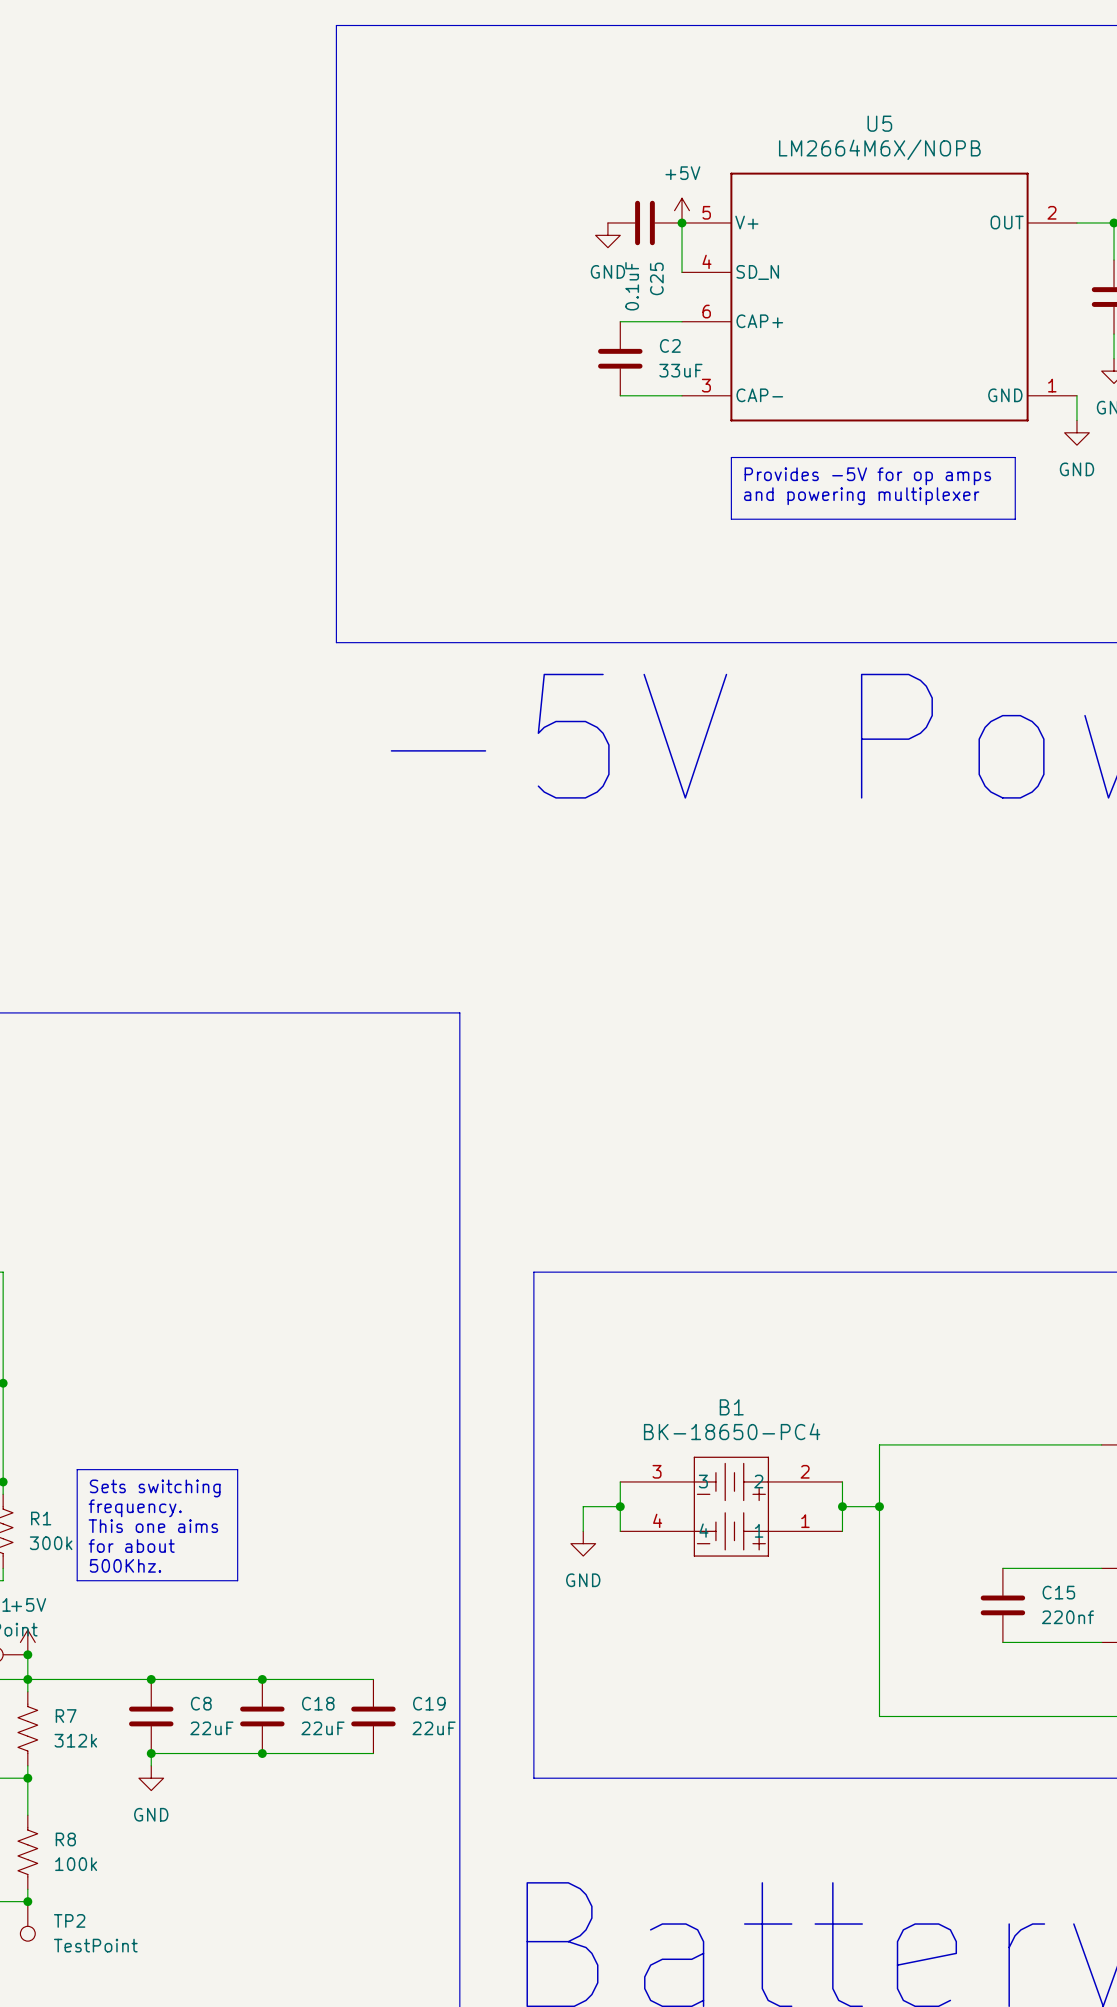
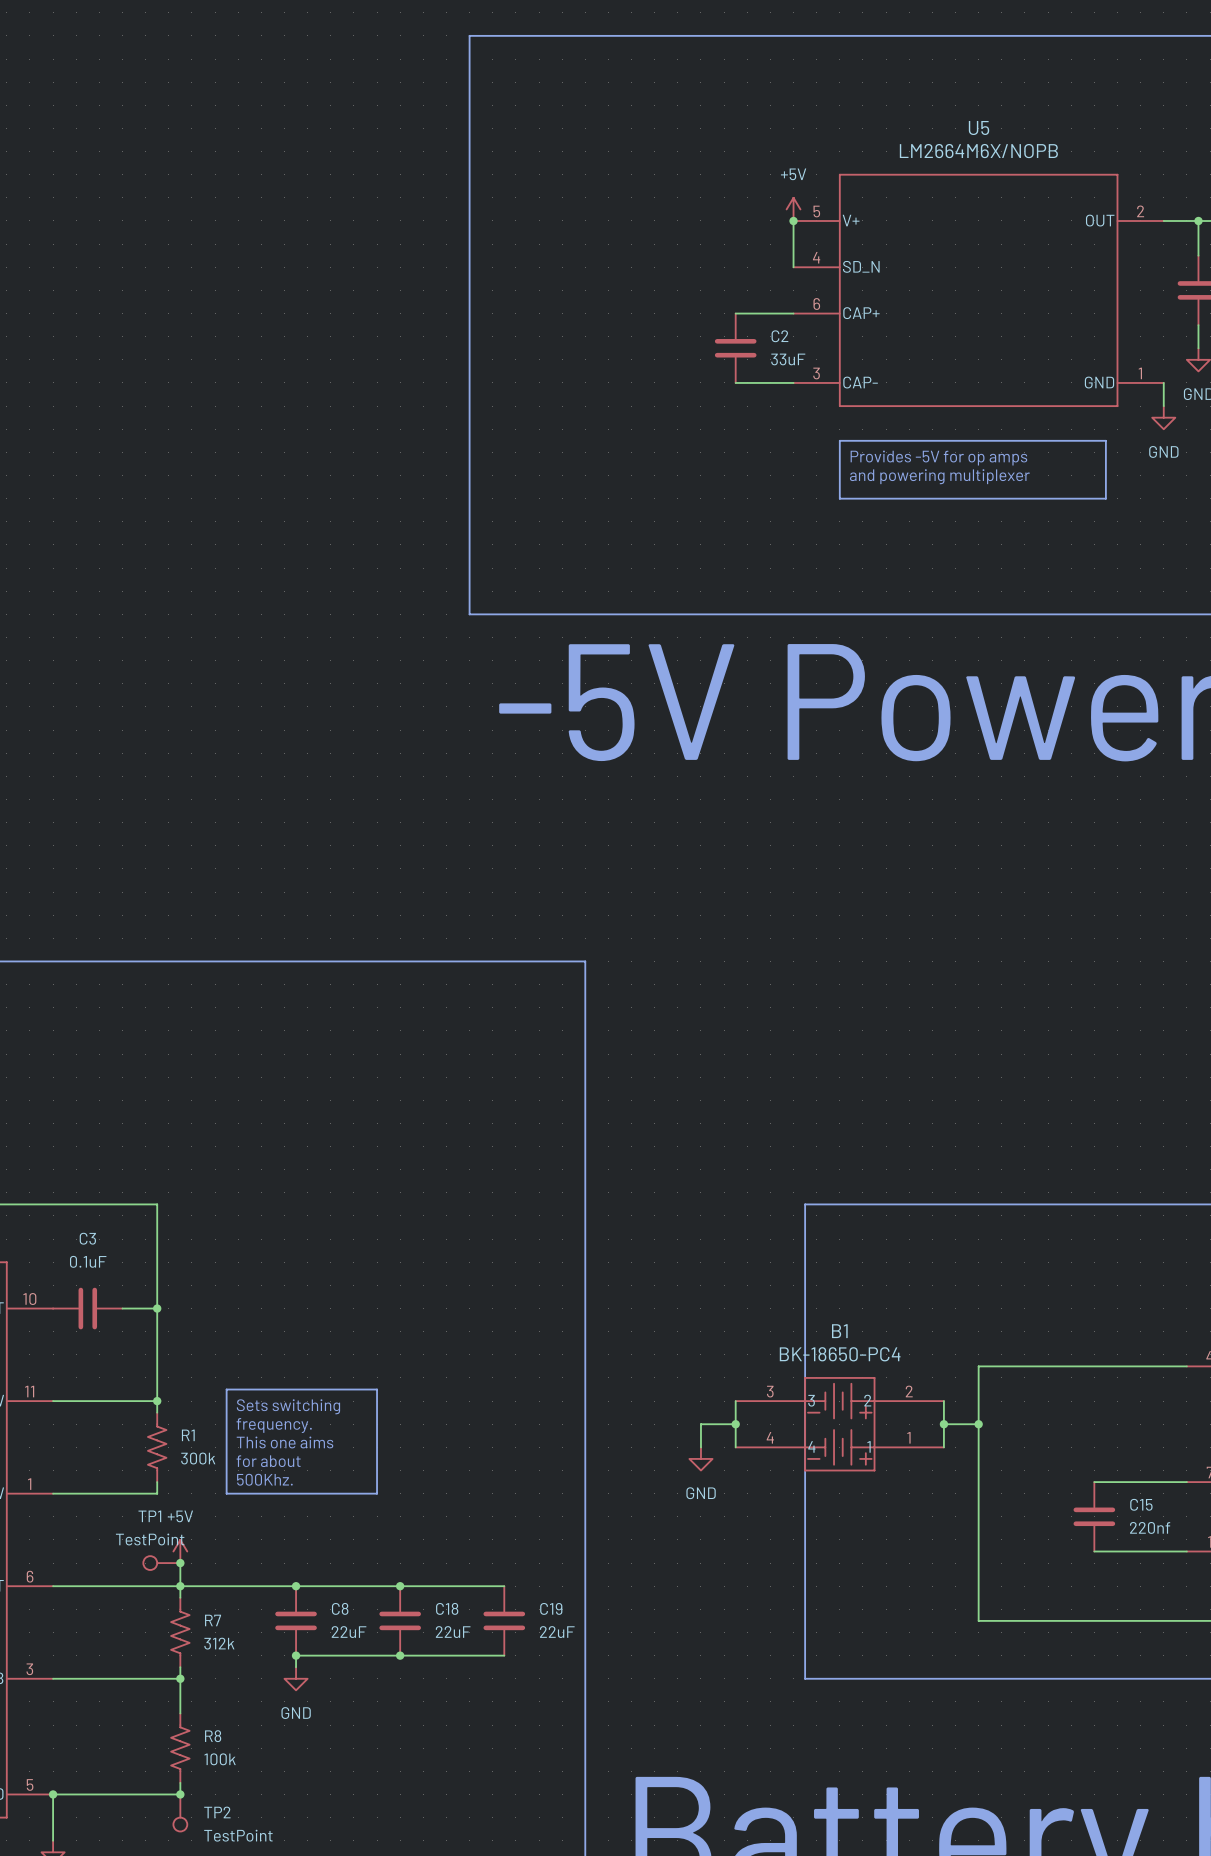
C25: 0.1uF (644, 222) -> none
power symbol: GND (607, 235) -> none
line: (694, 1272) (533, 1272) (533, 1778) (694, 1778) -> (805, 1204) (805, 1678)

